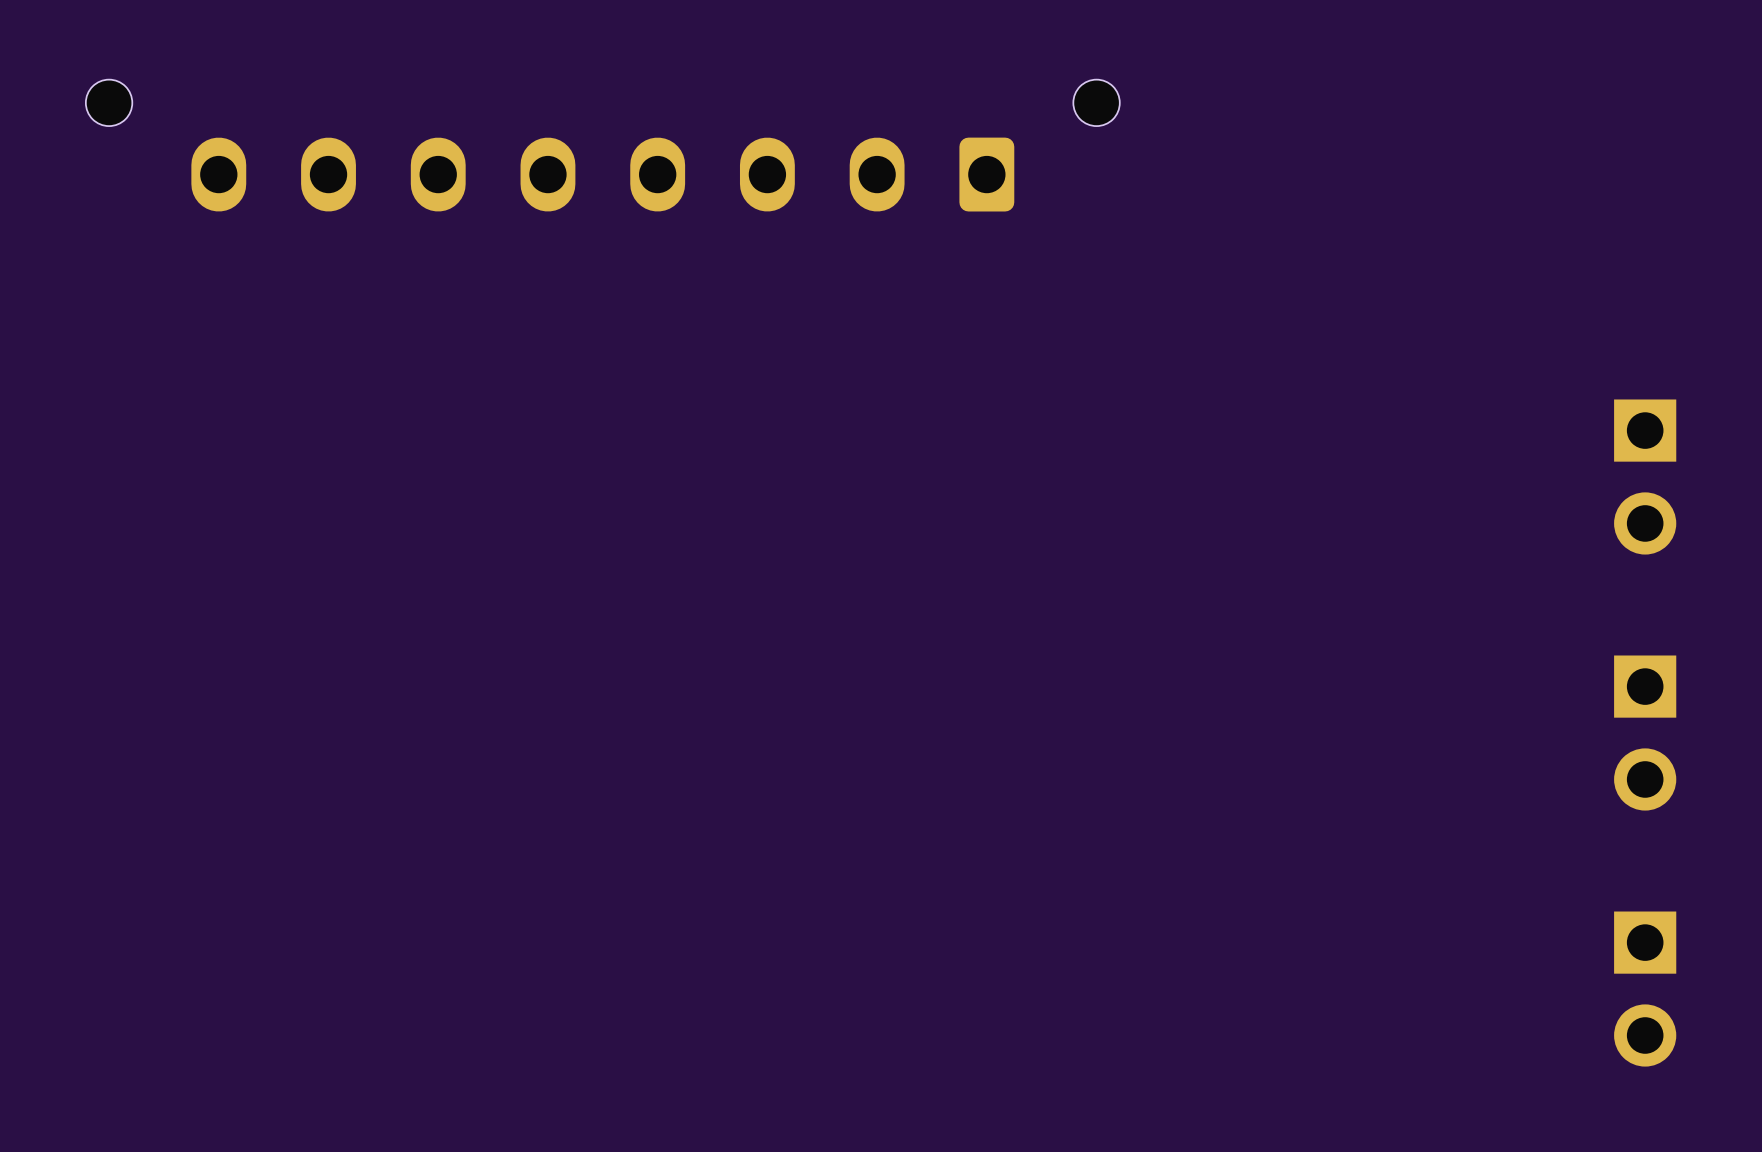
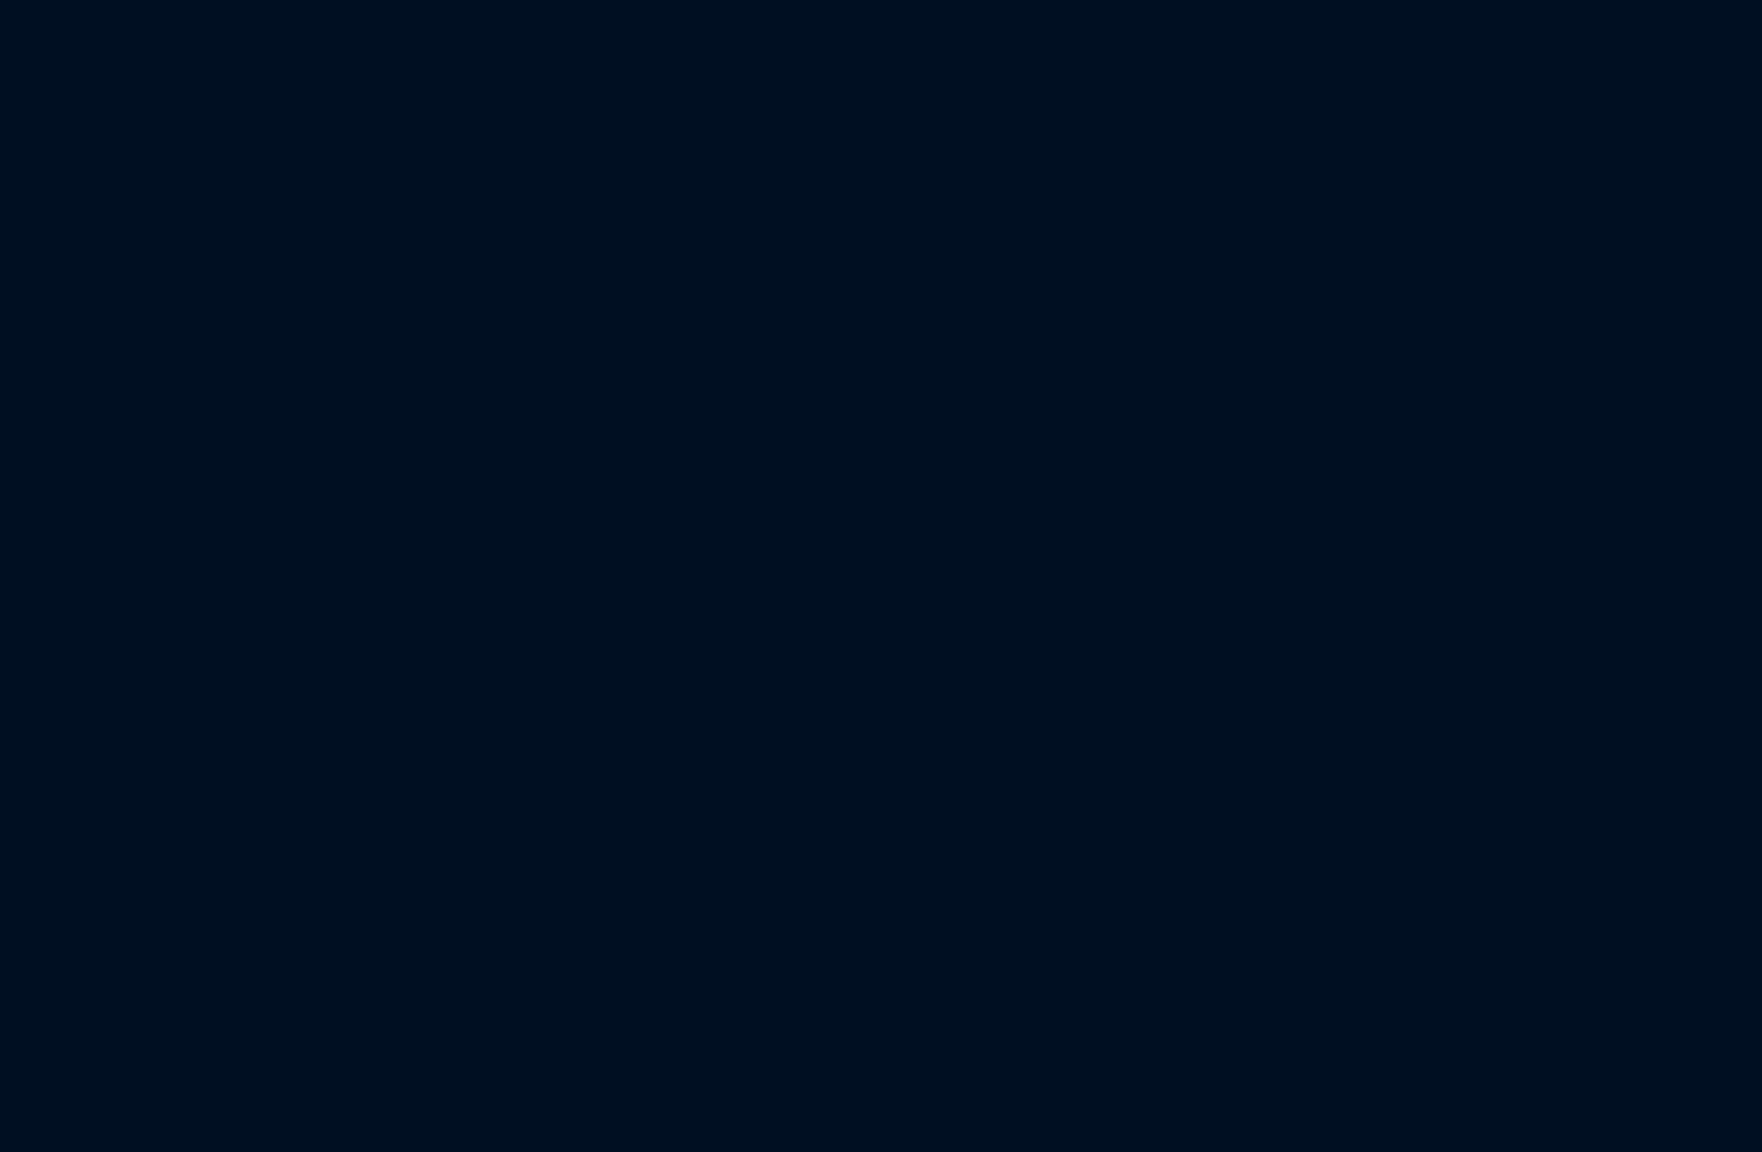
part: (602, 145) -> none
part: (1645, 477) -> none
part: (1645, 733) -> none
part: (1645, 989) -> none

